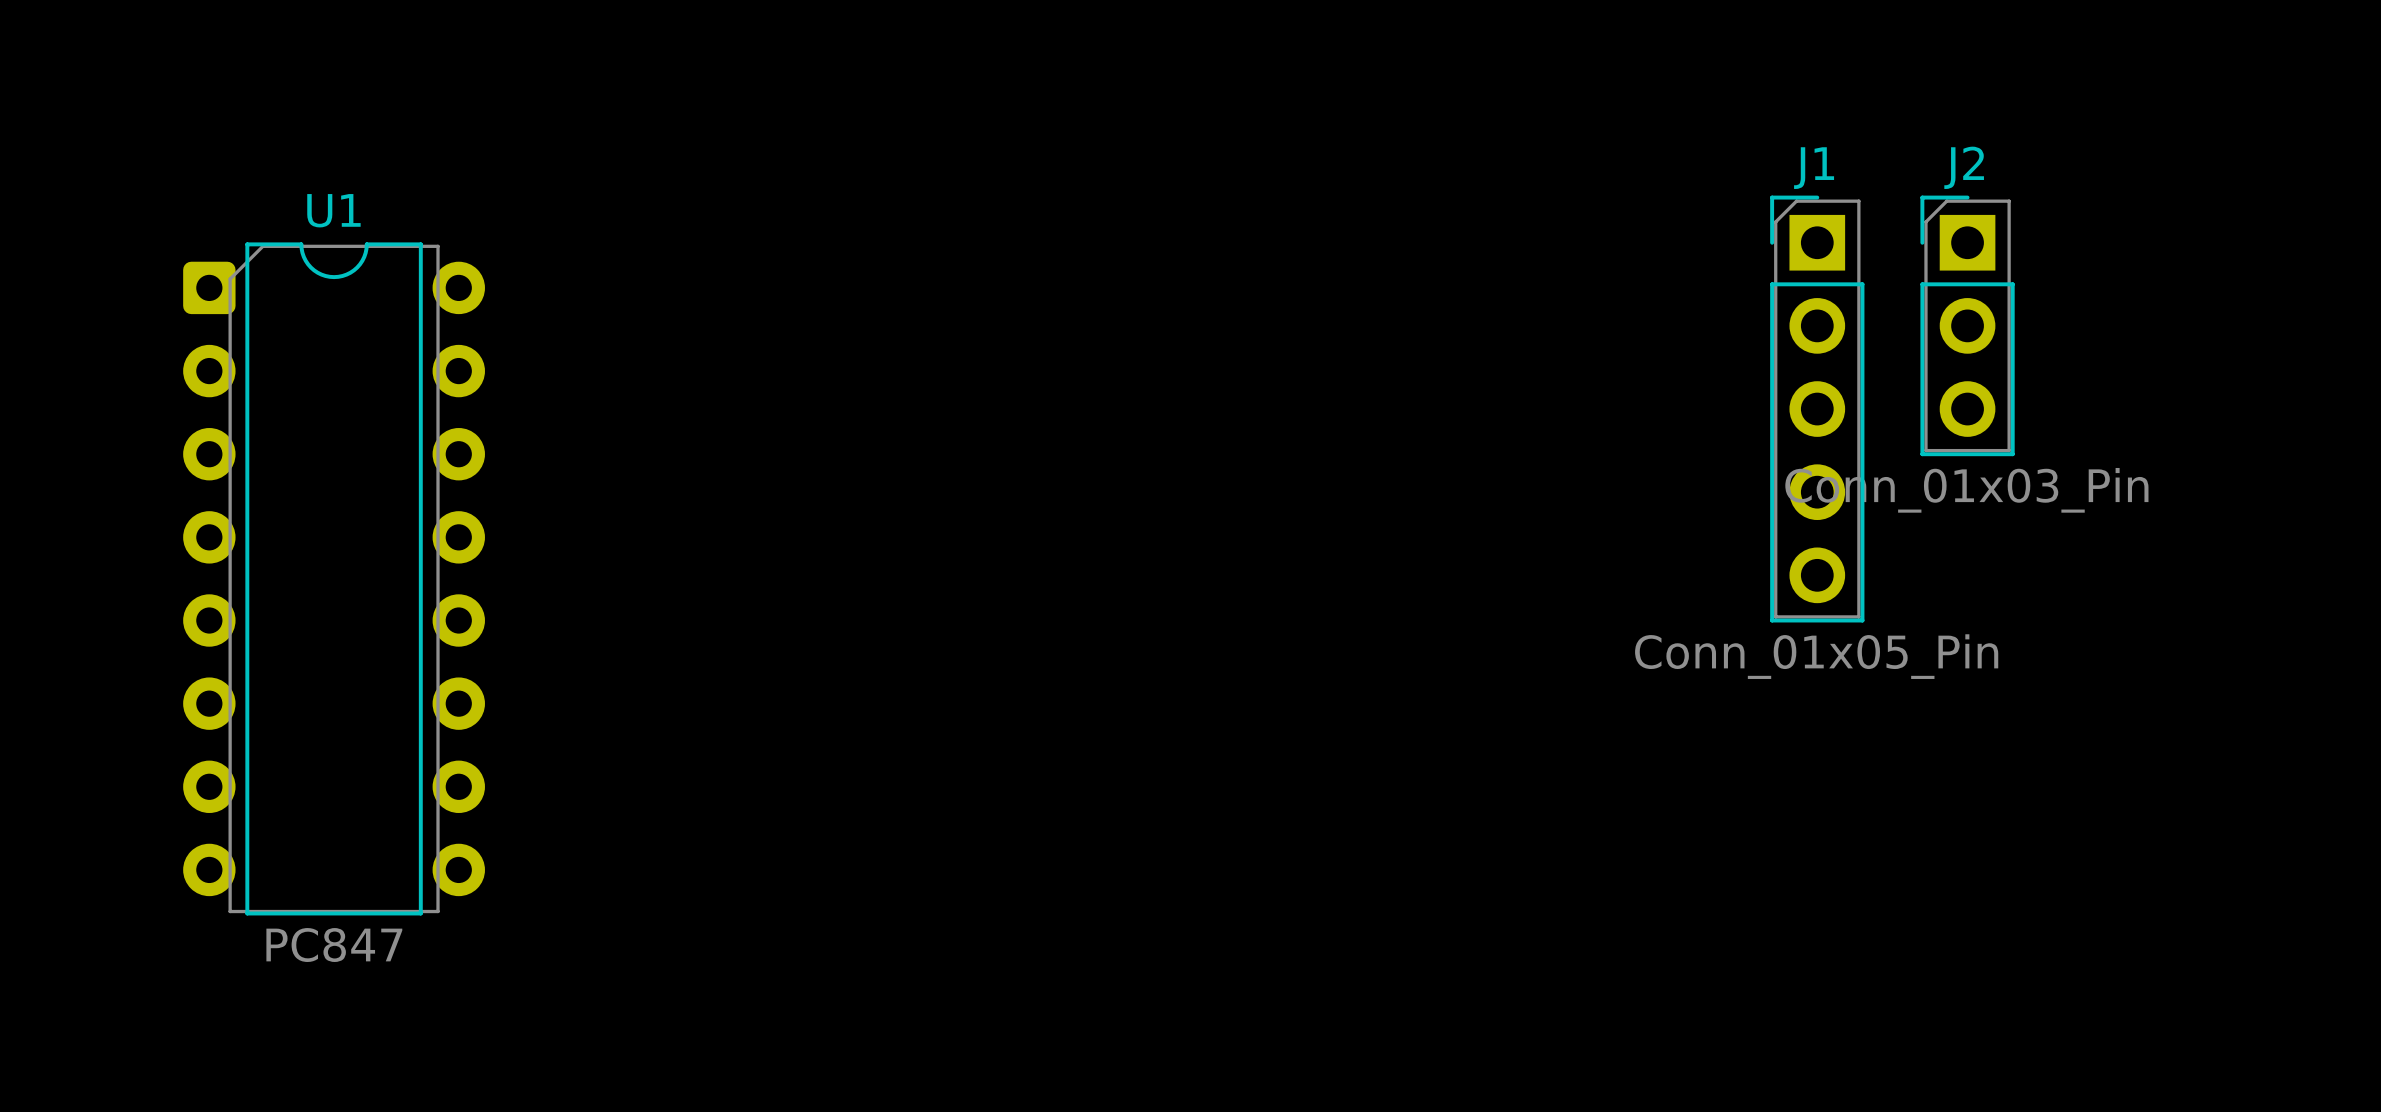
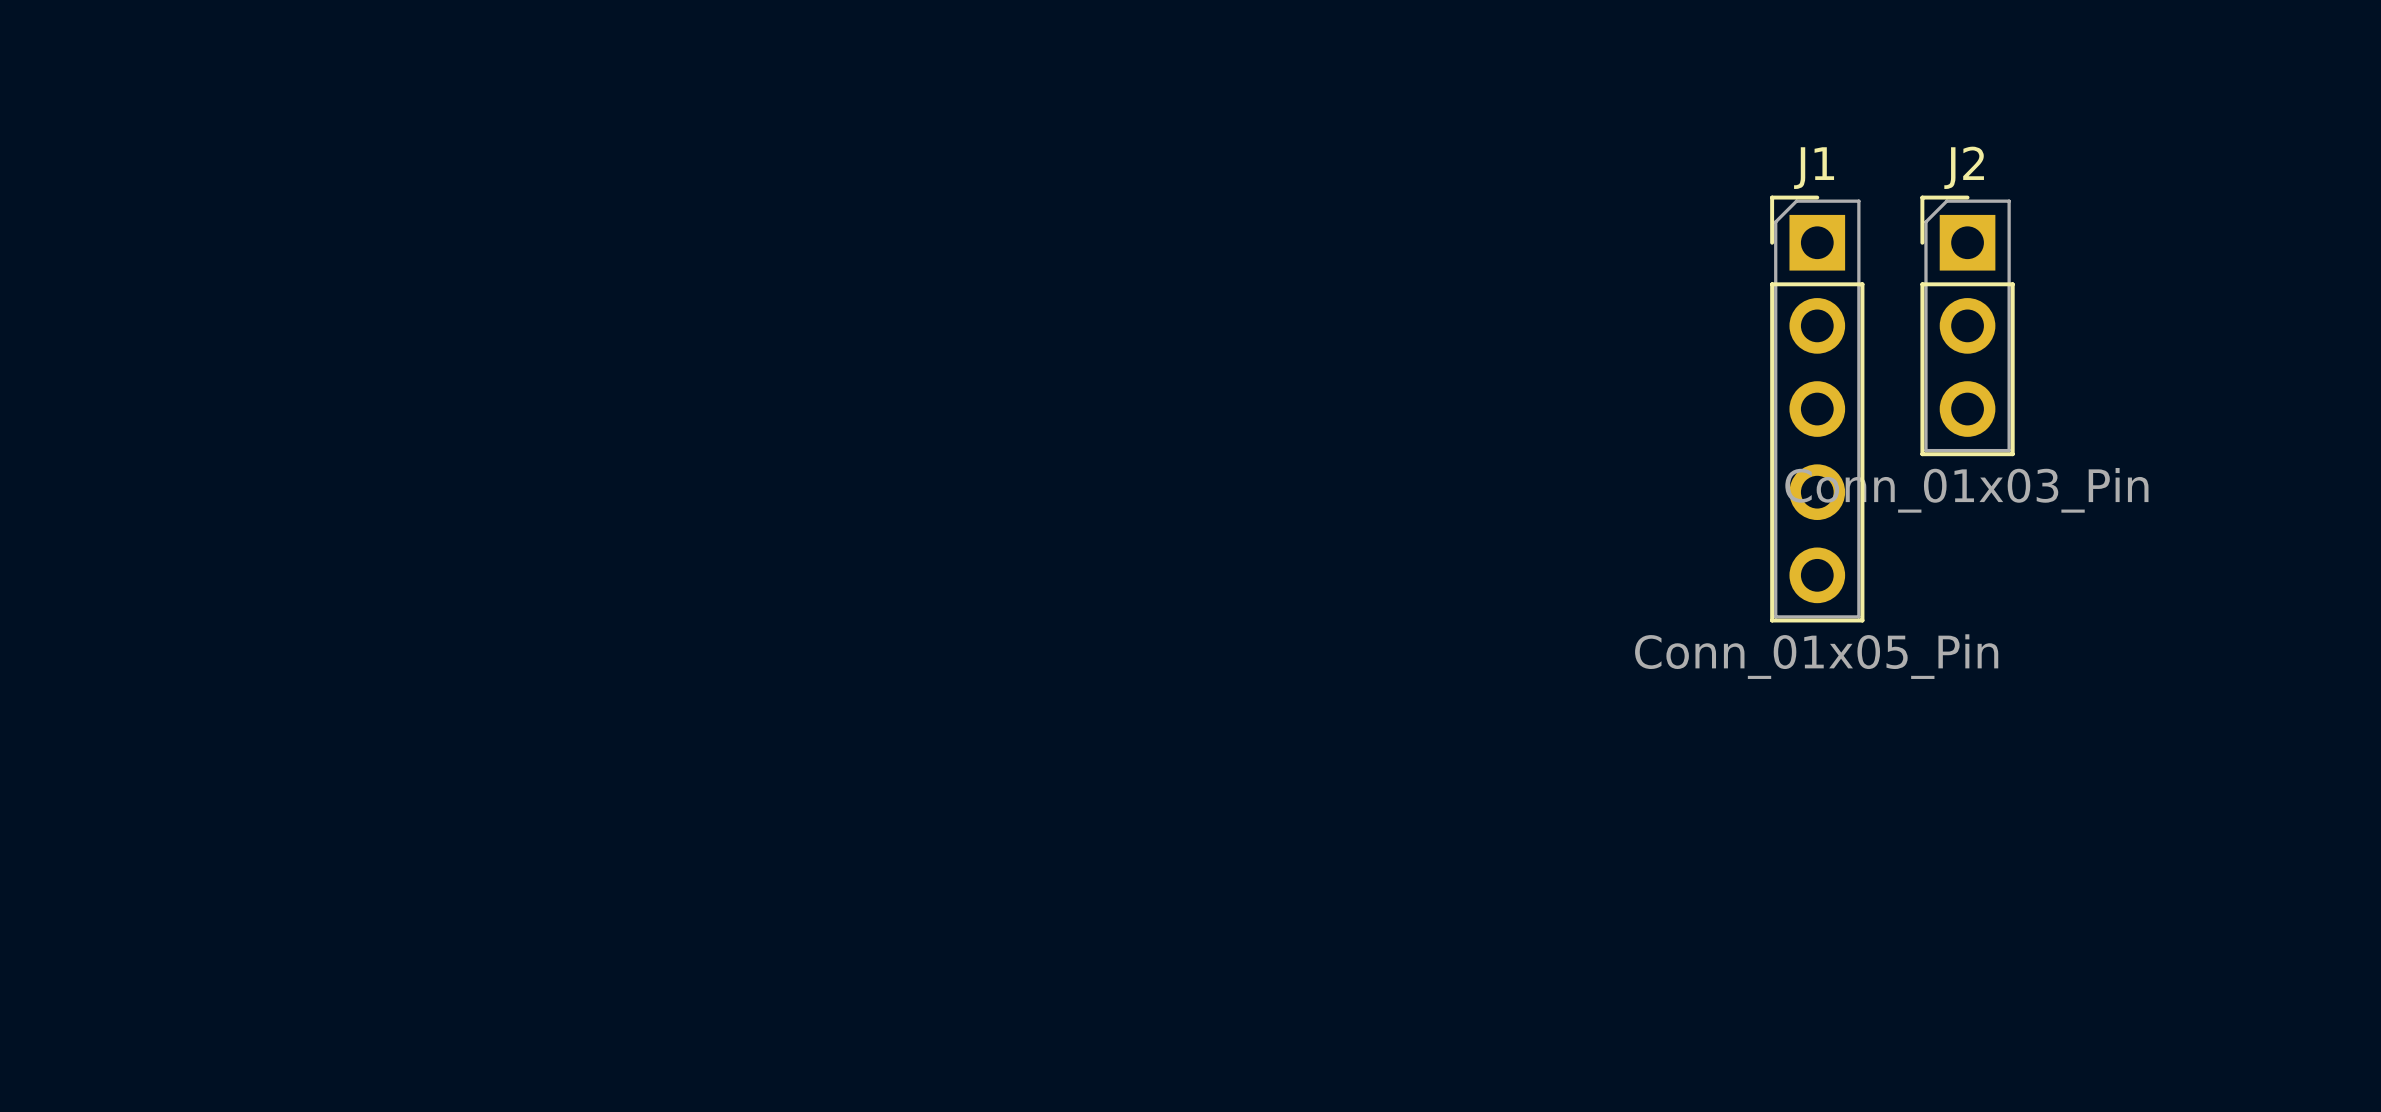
U1: PC847 (334, 578) -> none

